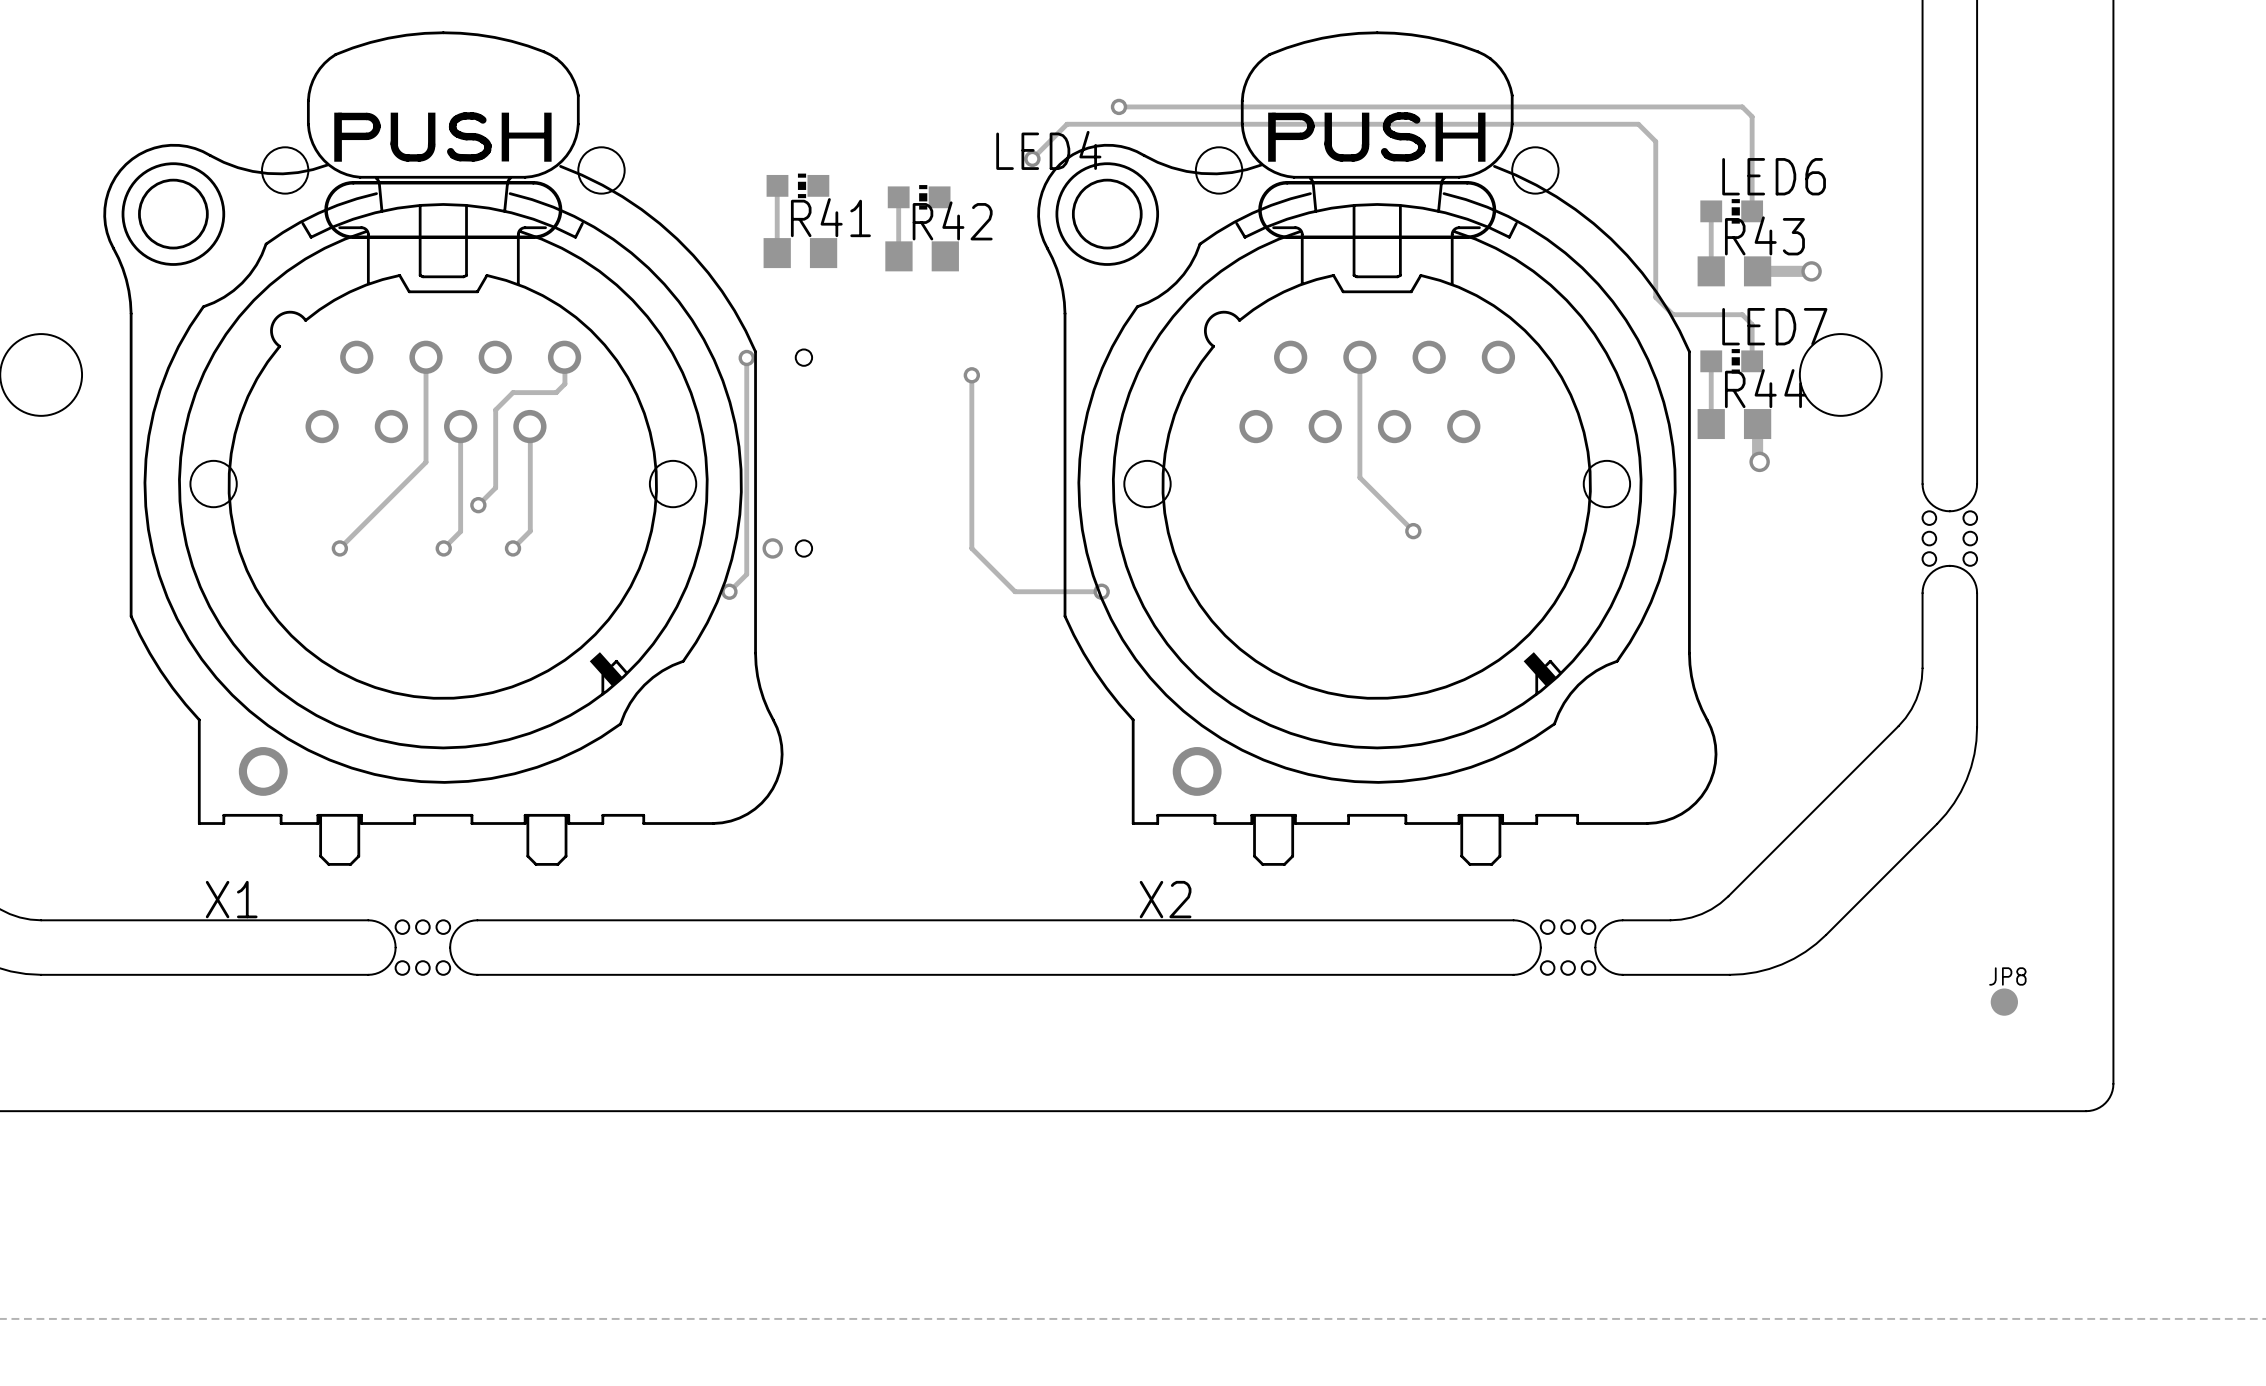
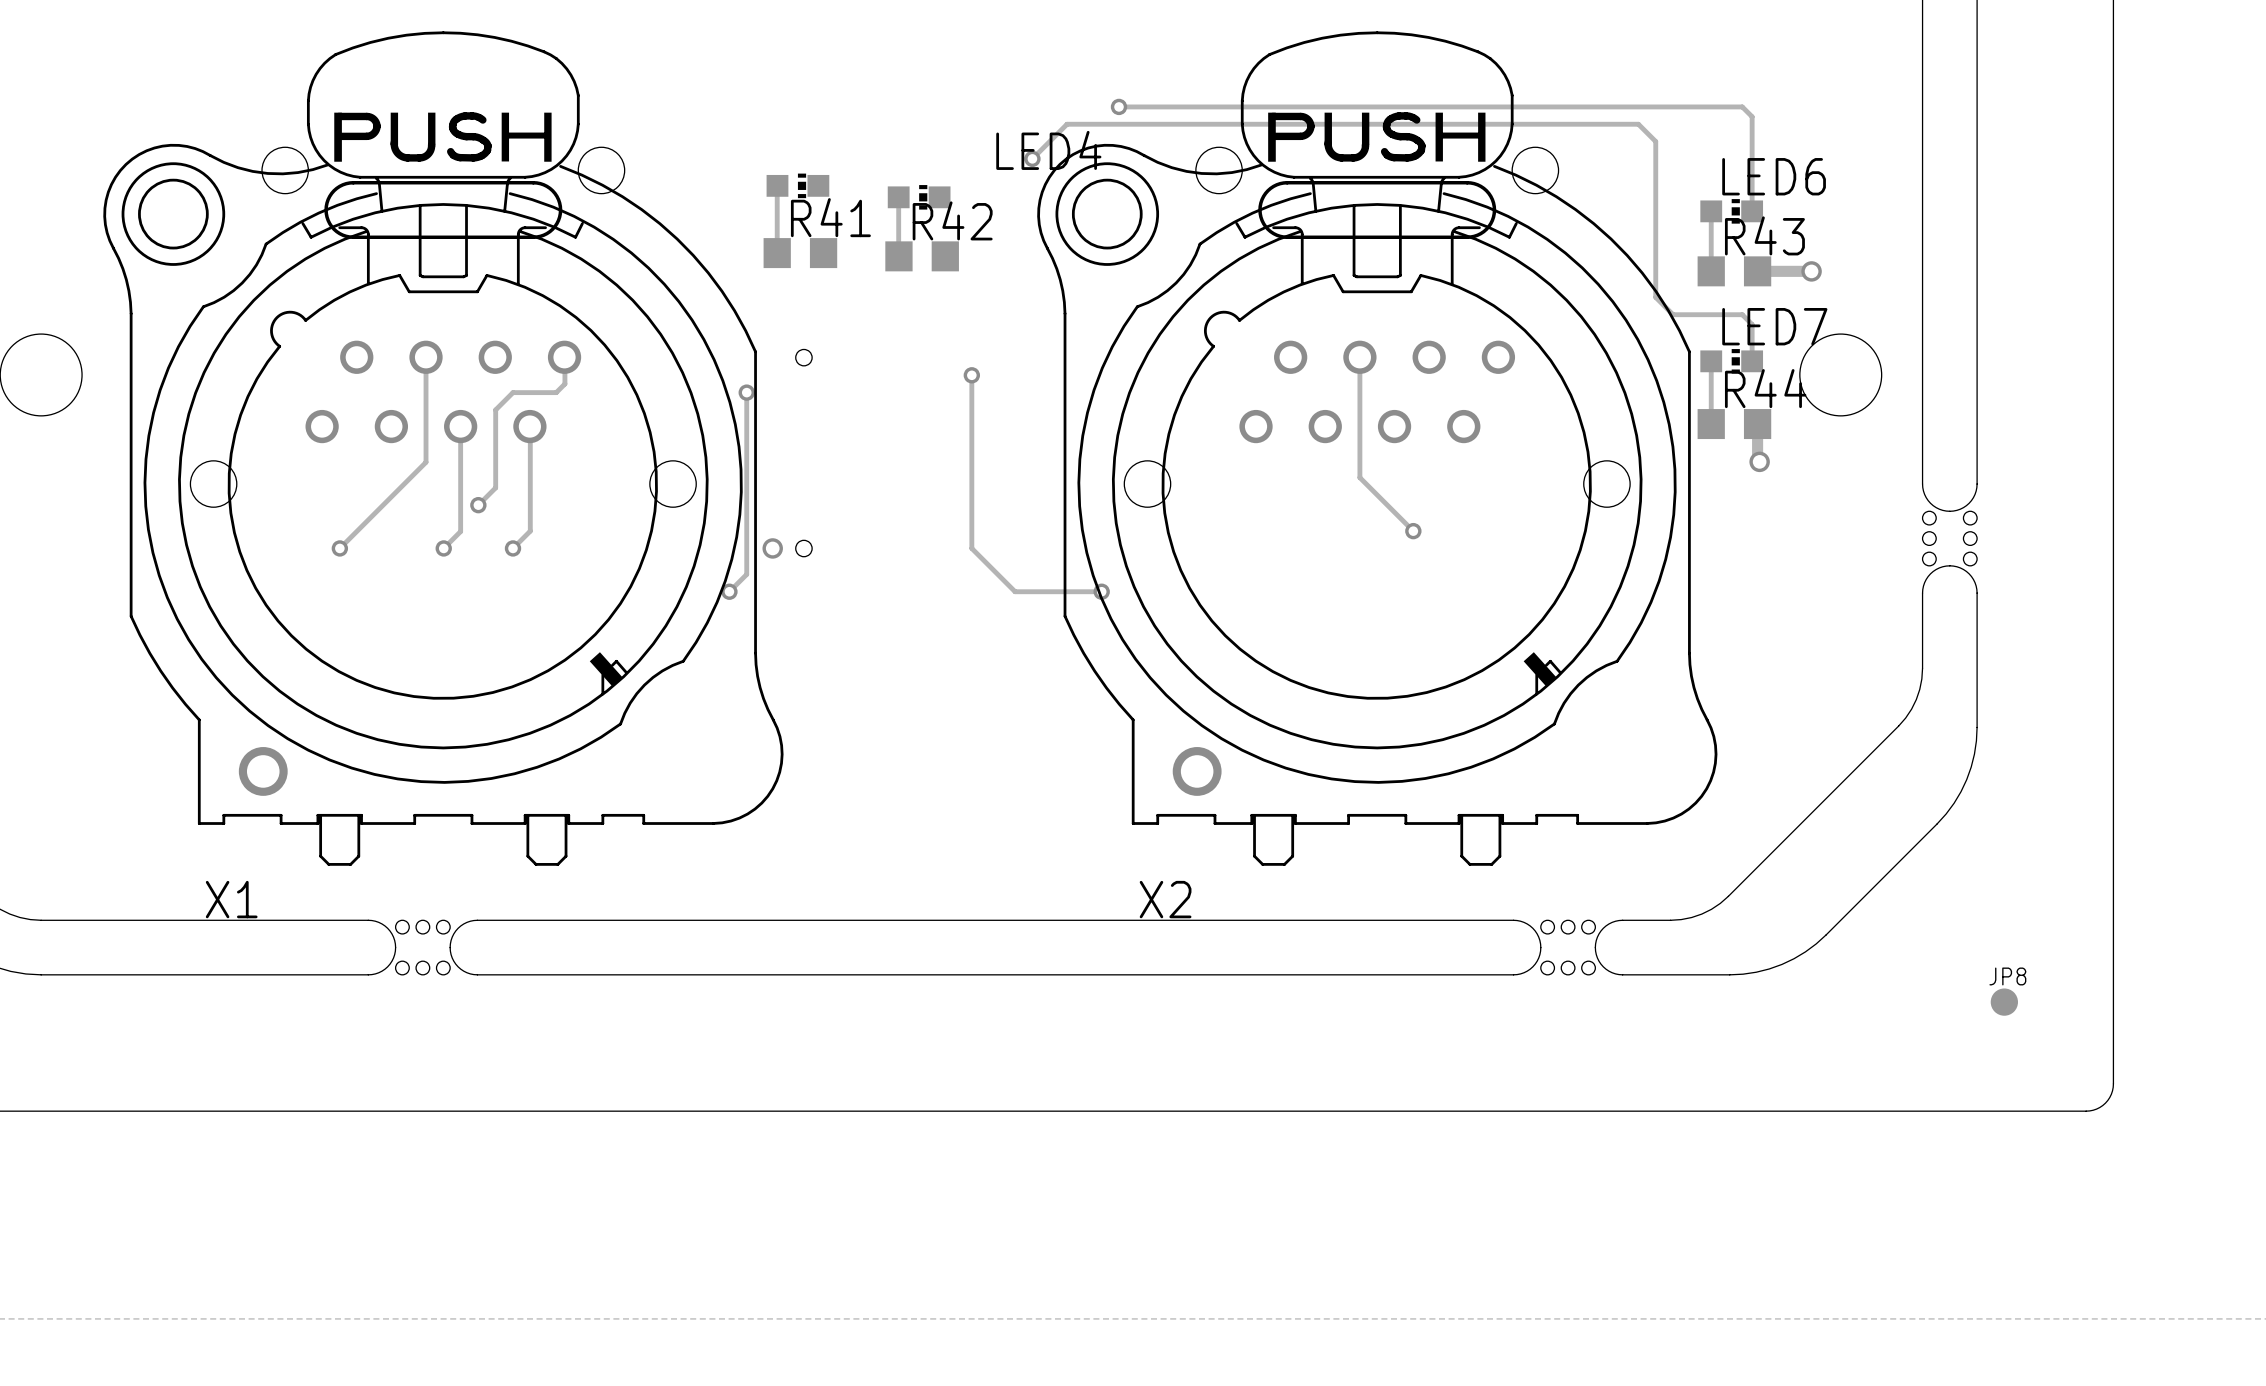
track: (746, 357) (746, 392) -> none
via position: (746, 357) -> (746, 392)

